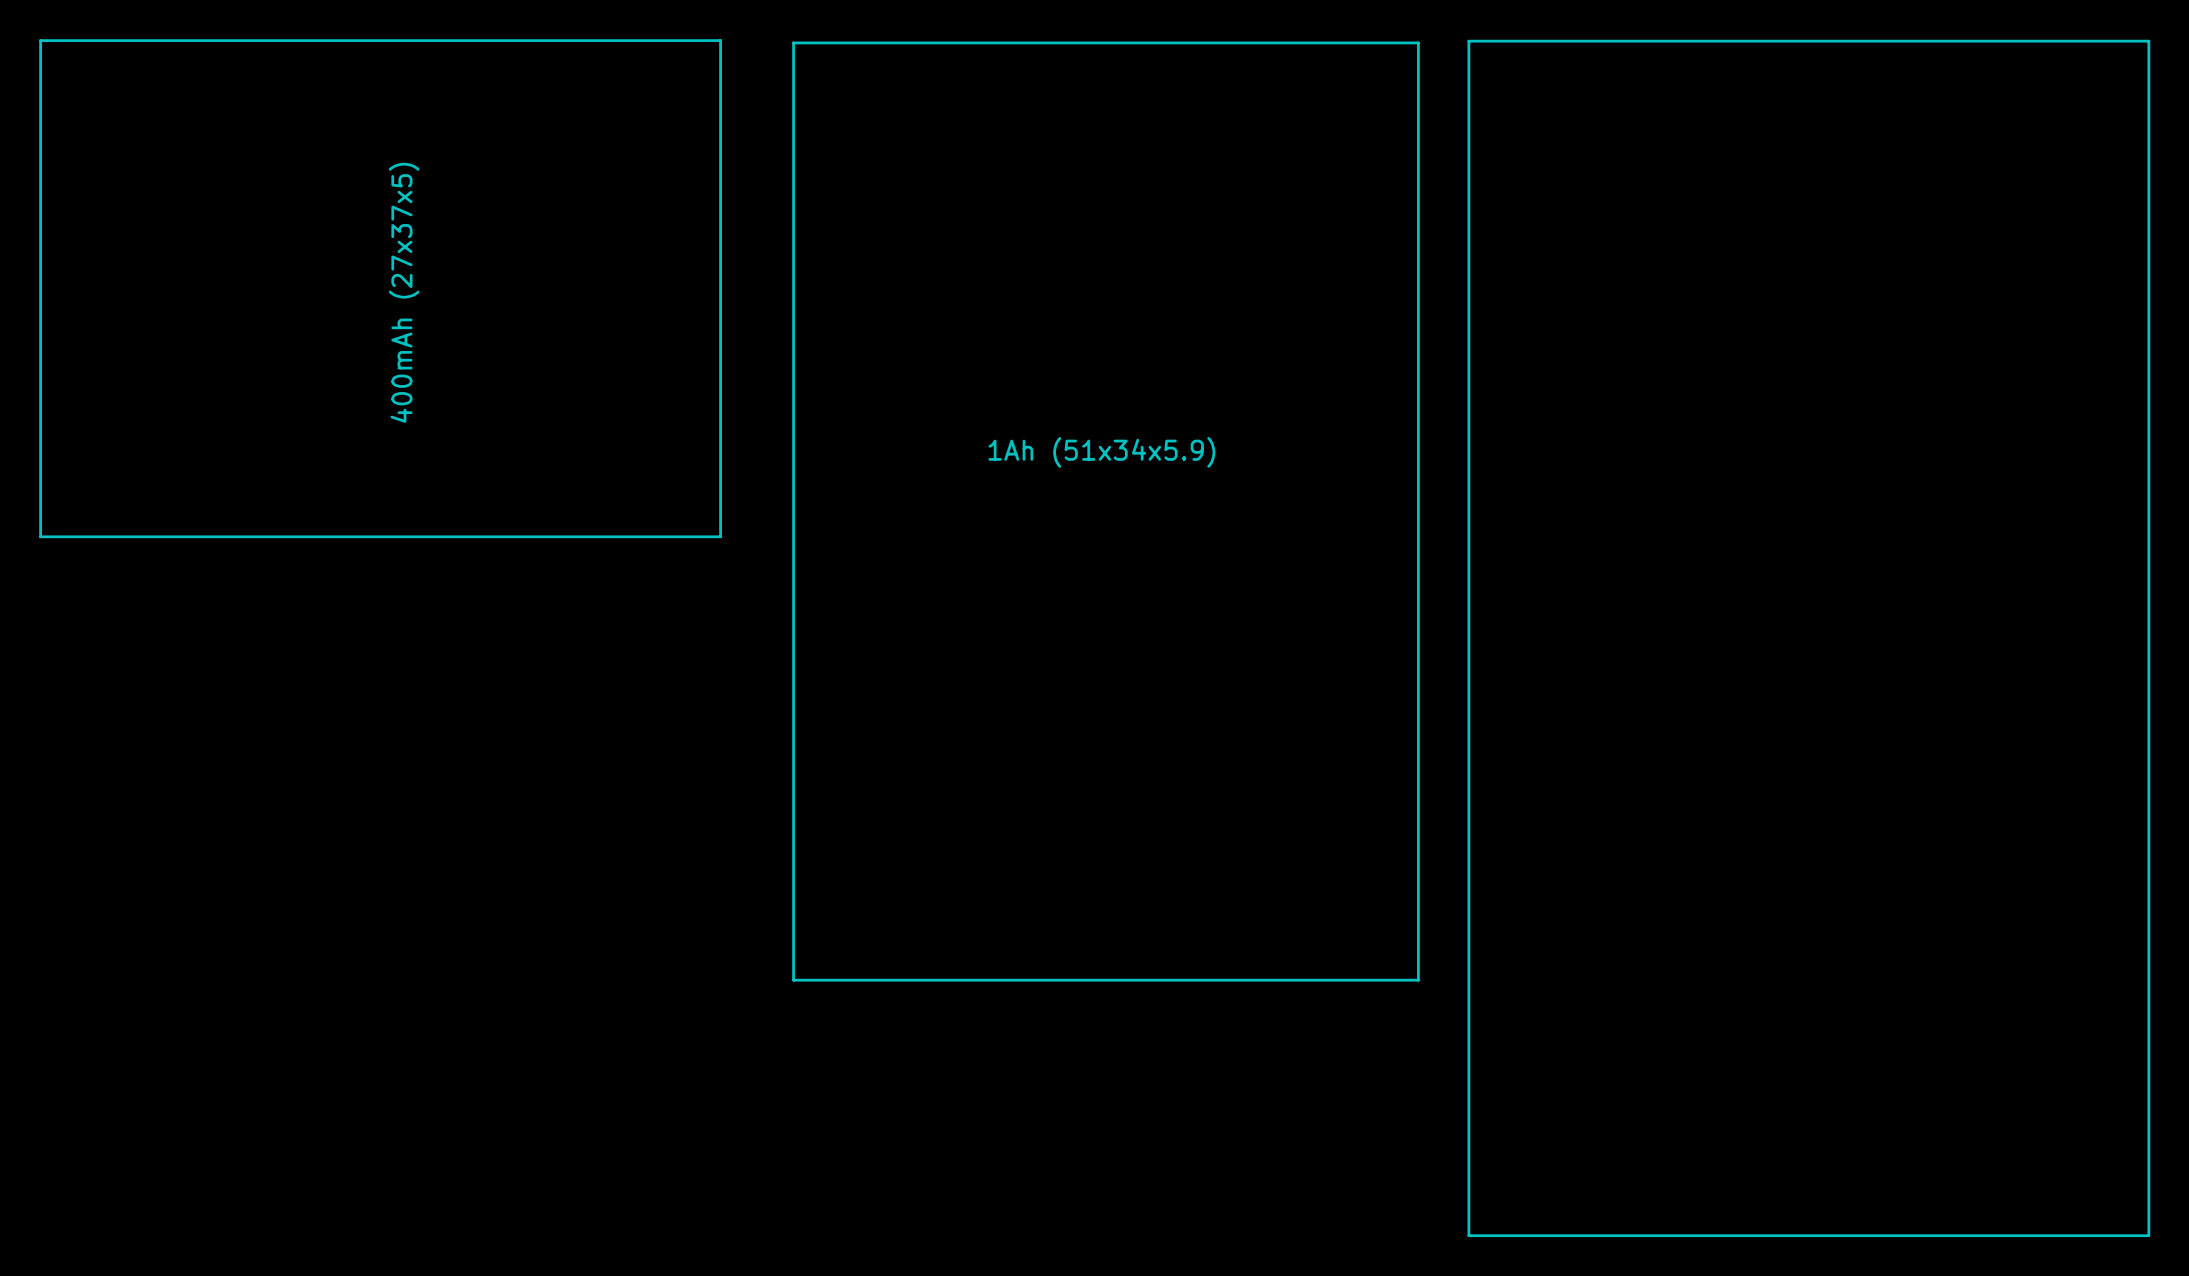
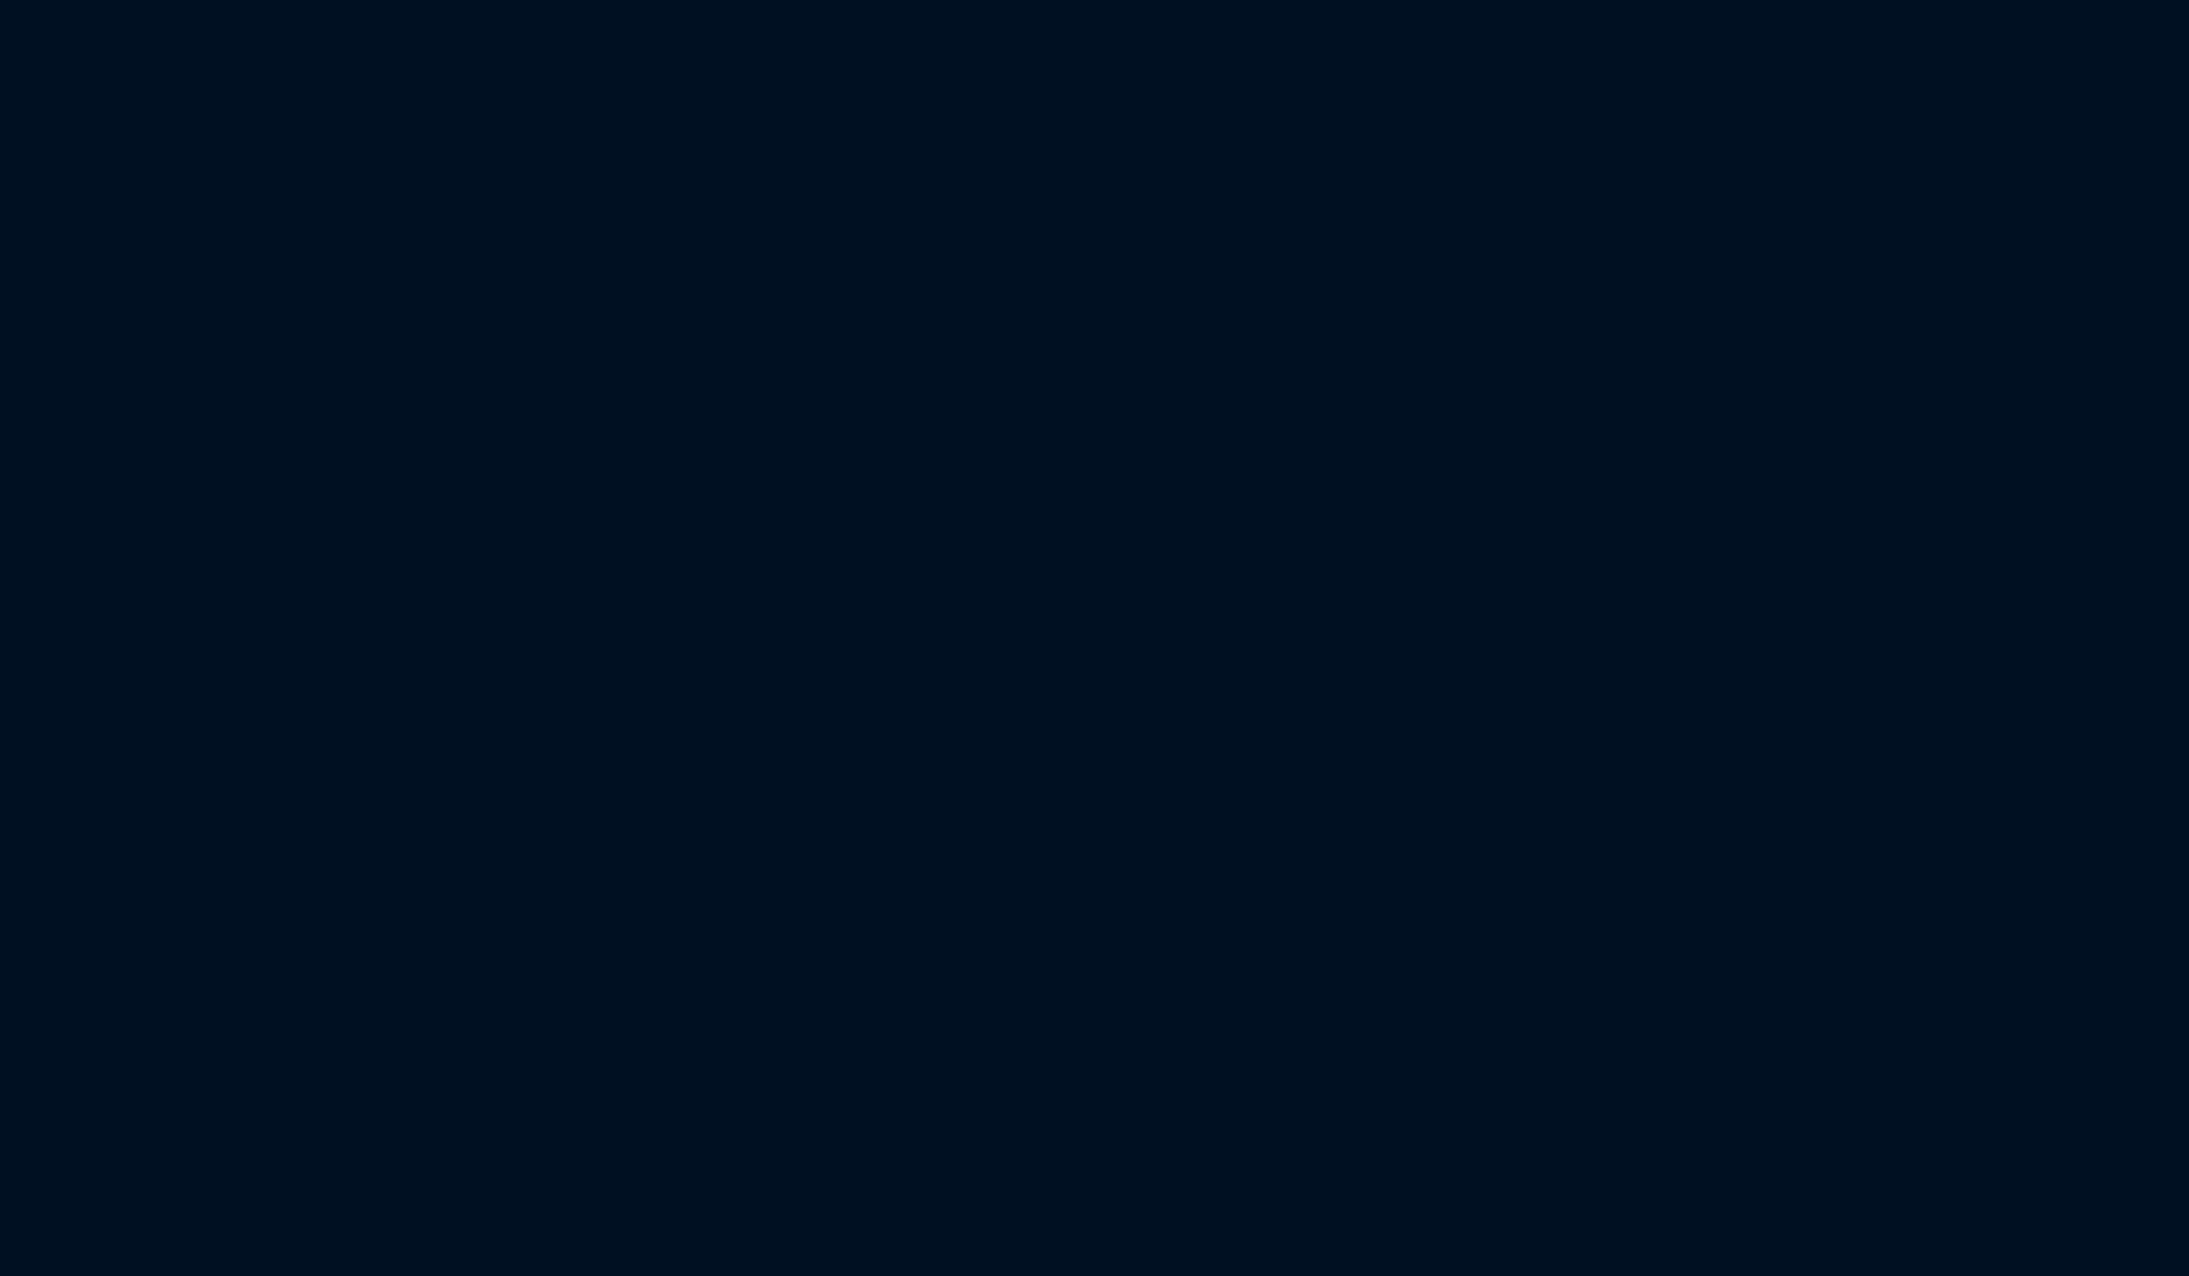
line: (40, 40) (40, 536) (720, 536) (720, 40) (40, 40) -> none
line: (1468, 41) (1468, 1235) (2148, 1235) (2148, 41) (1468, 41) -> none
line: (793, 42) (793, 980) (1418, 980) (1418, 42) (793, 42) -> none
text: 400mAh (27x37x5) (404, 292) -> none
text: 1Ah (51x34x5.9) (1101, 452) -> none

